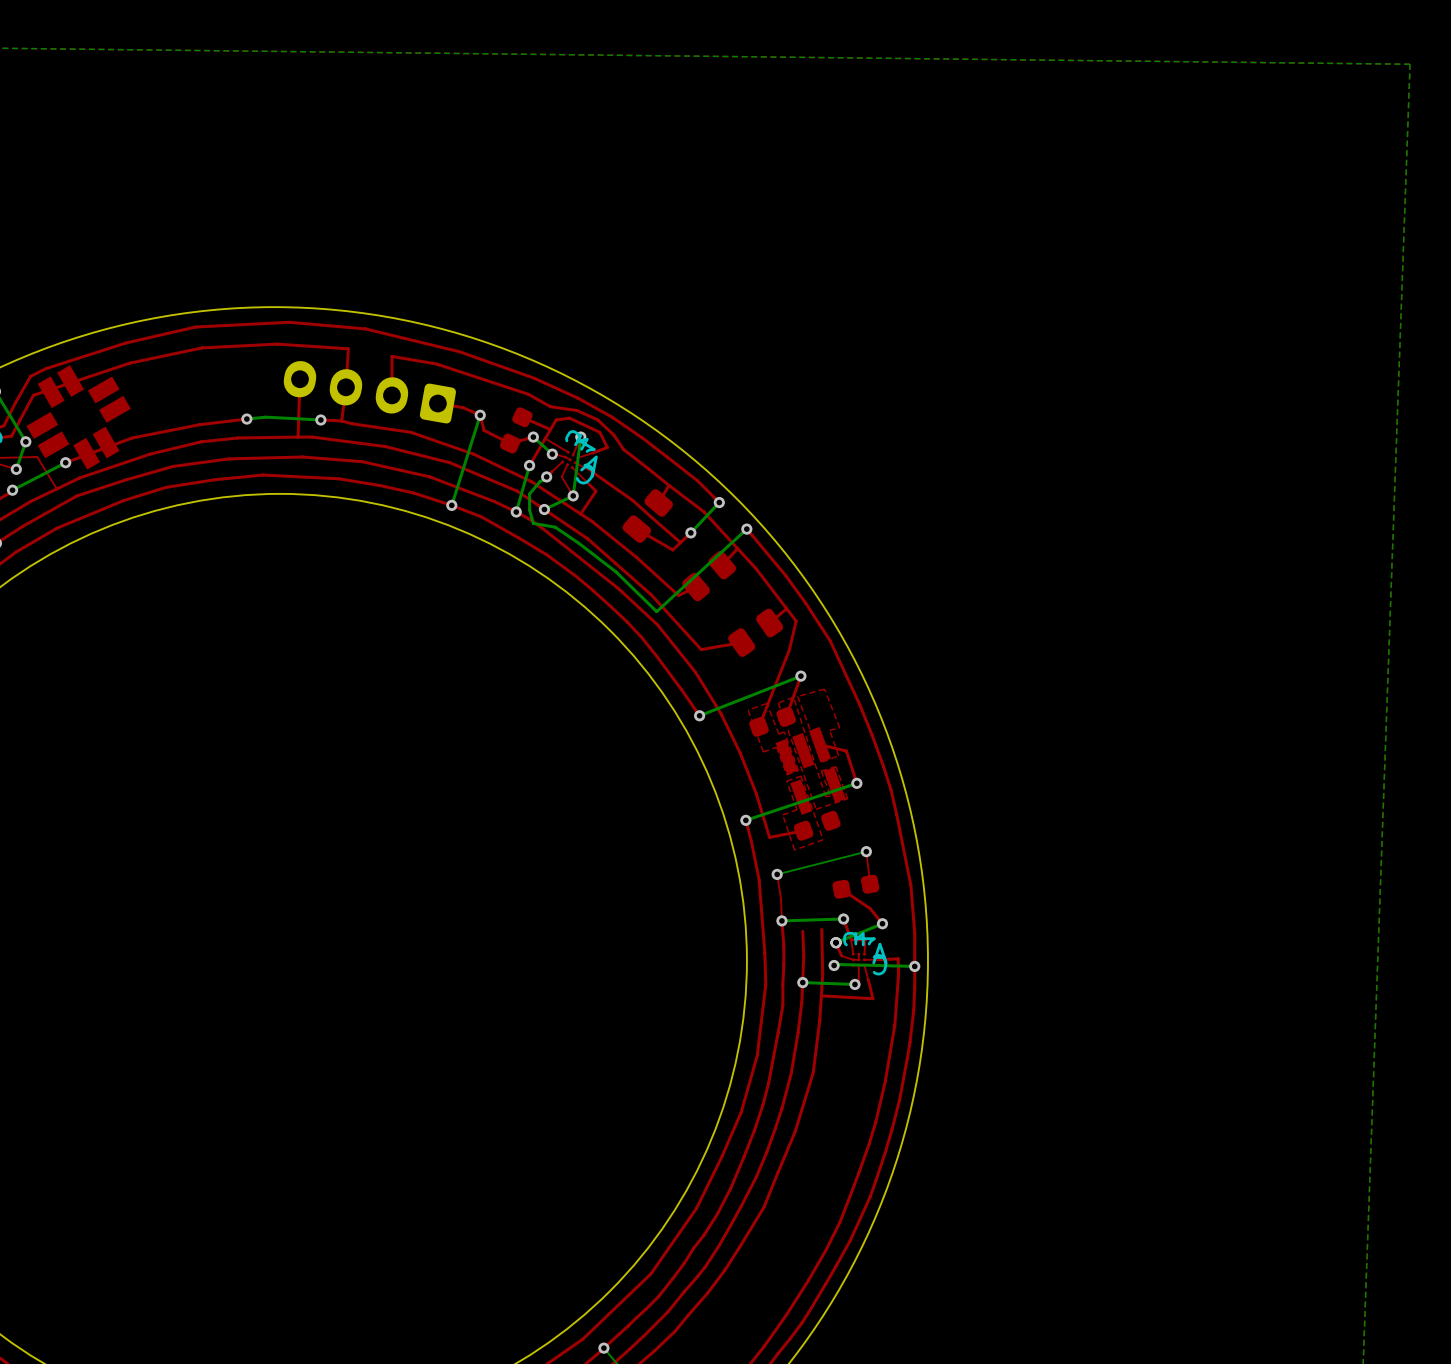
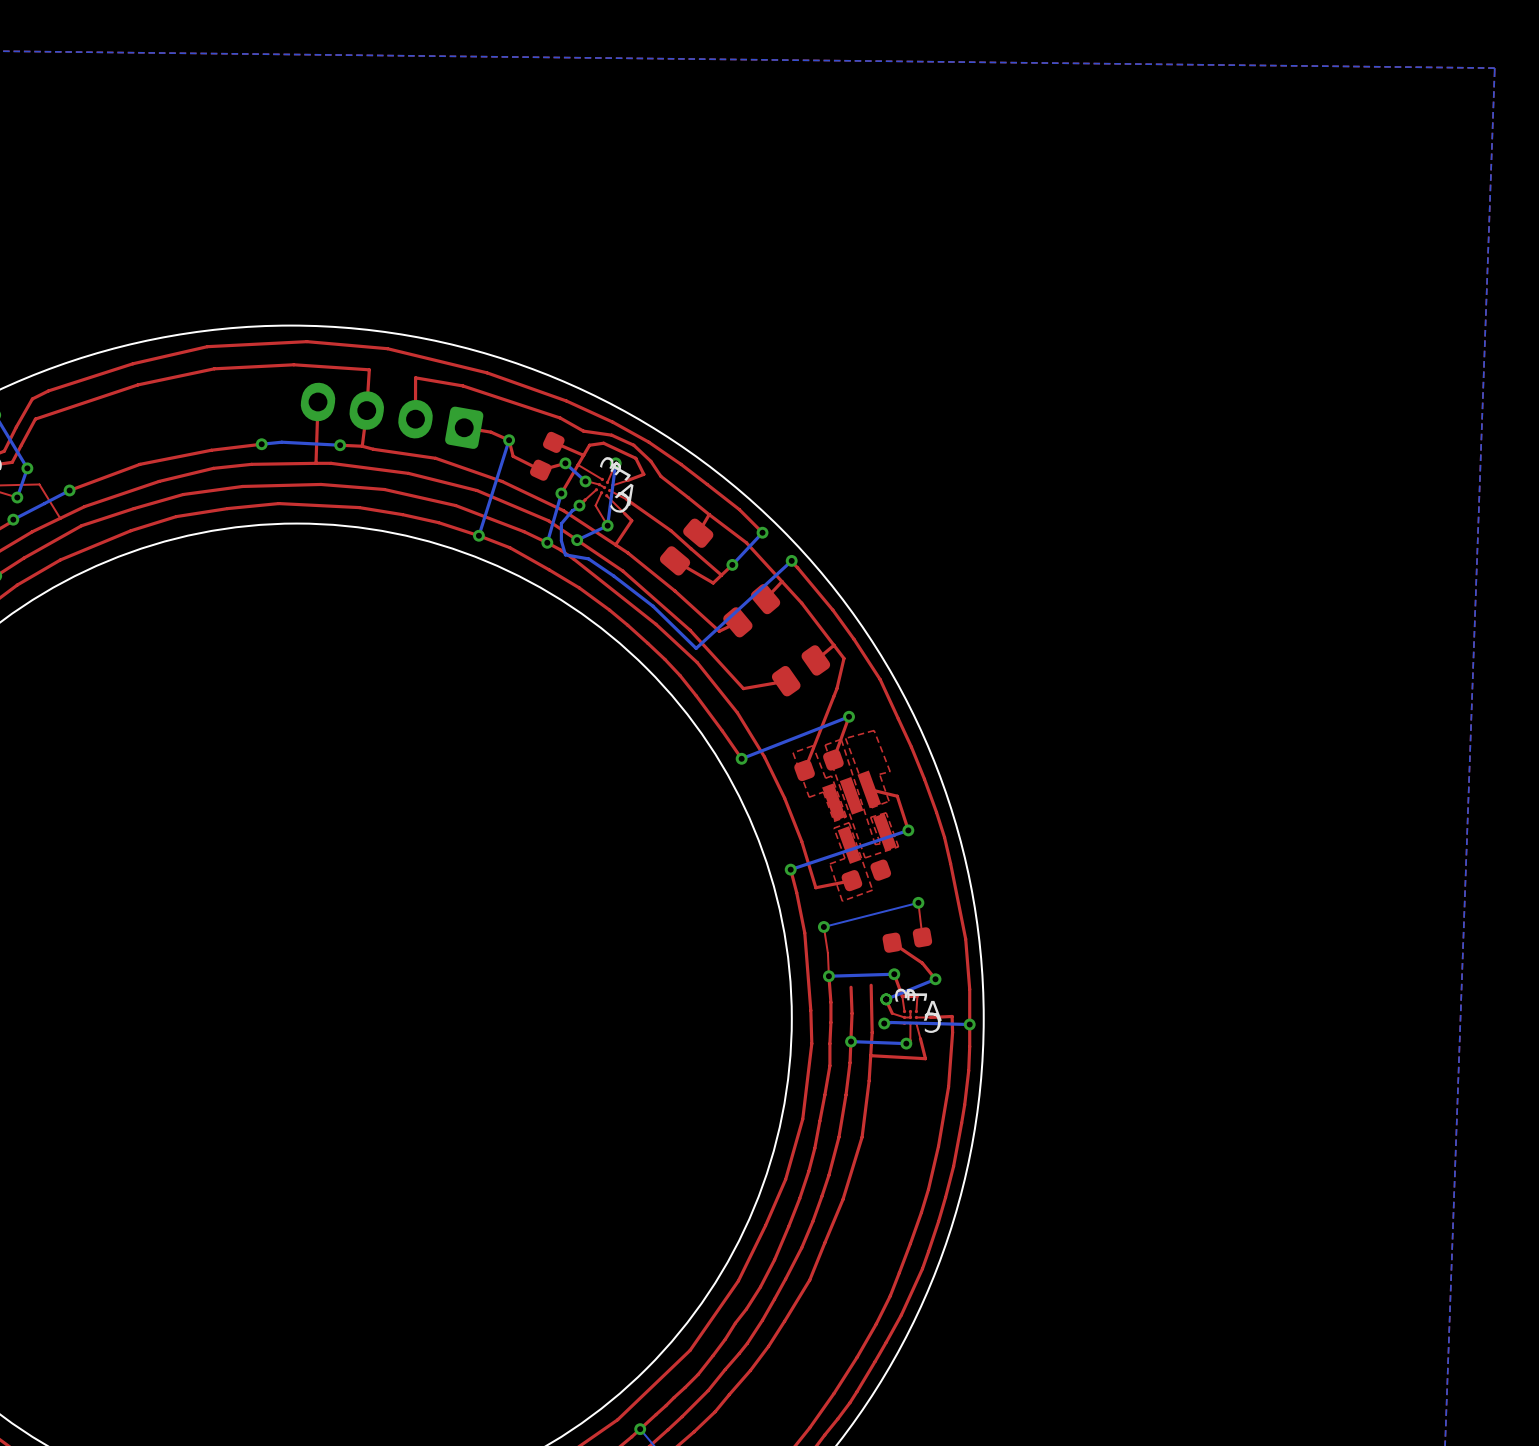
part: (78, 417) -> none

